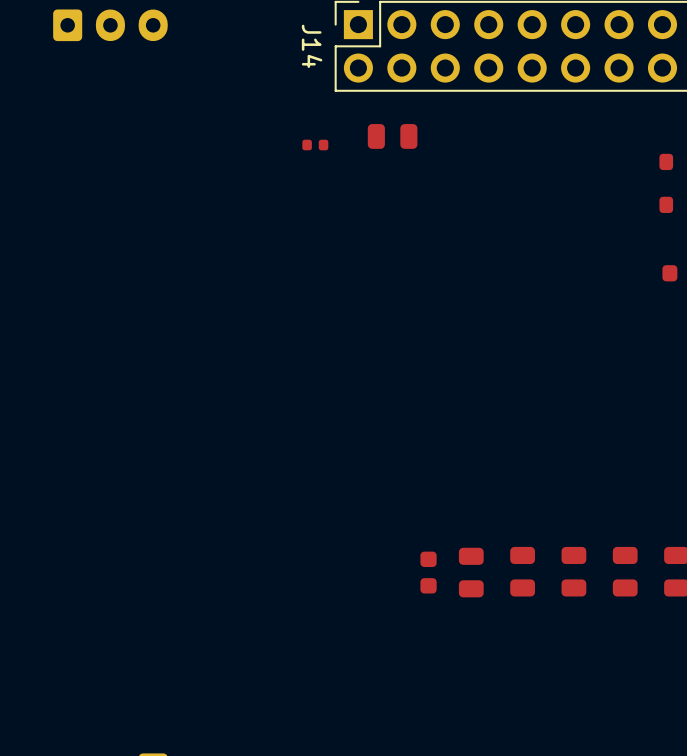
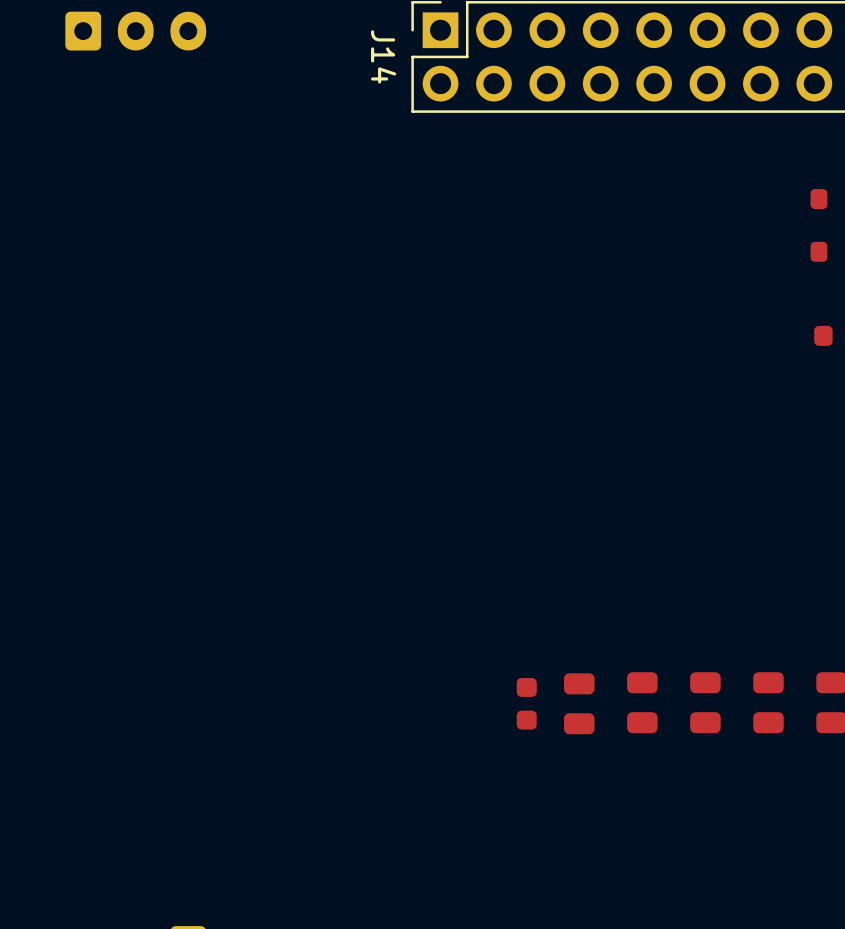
part: (392, 136) -> none
part: (315, 145) -> none

